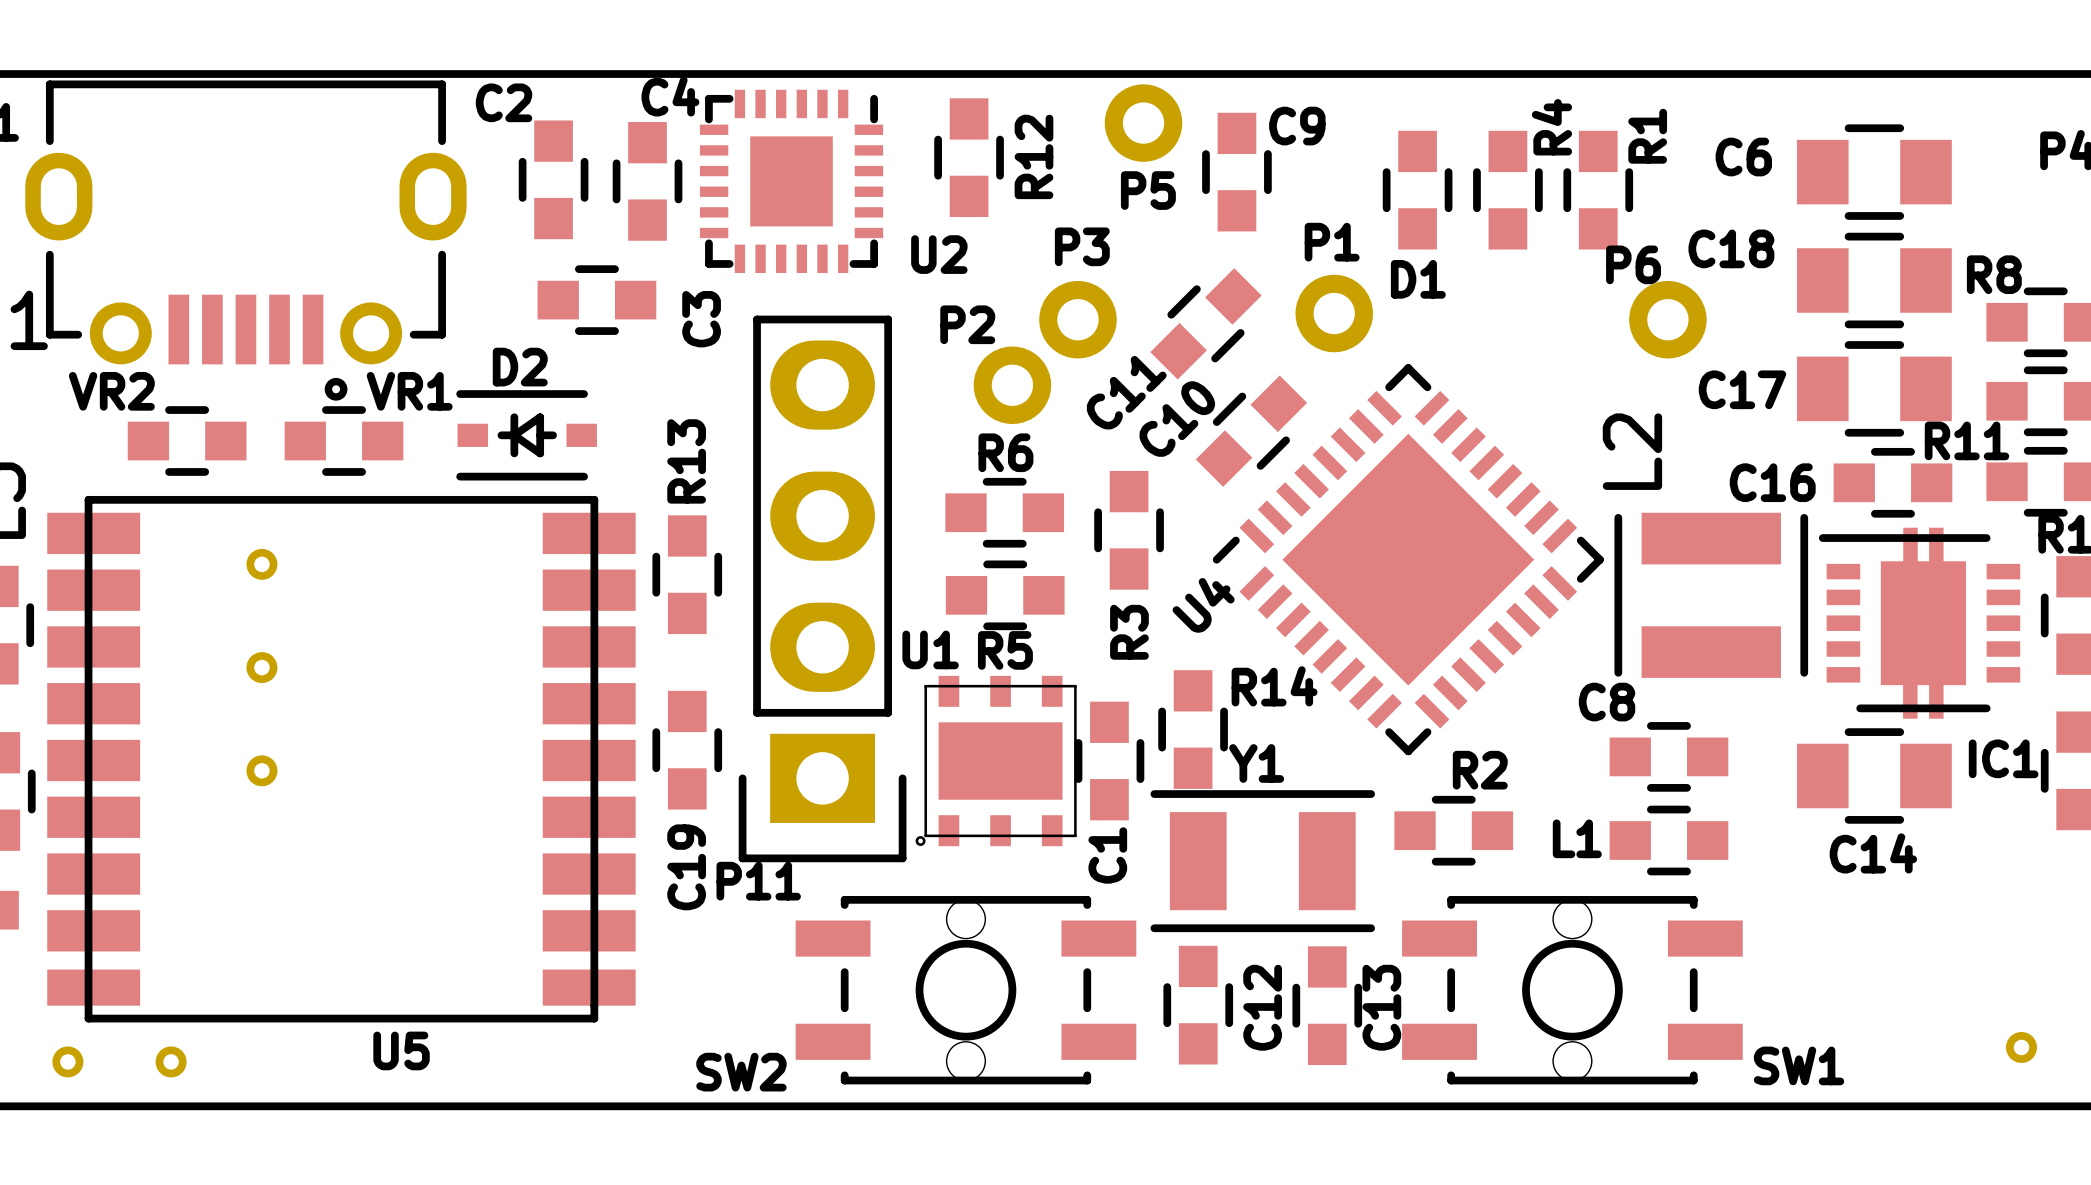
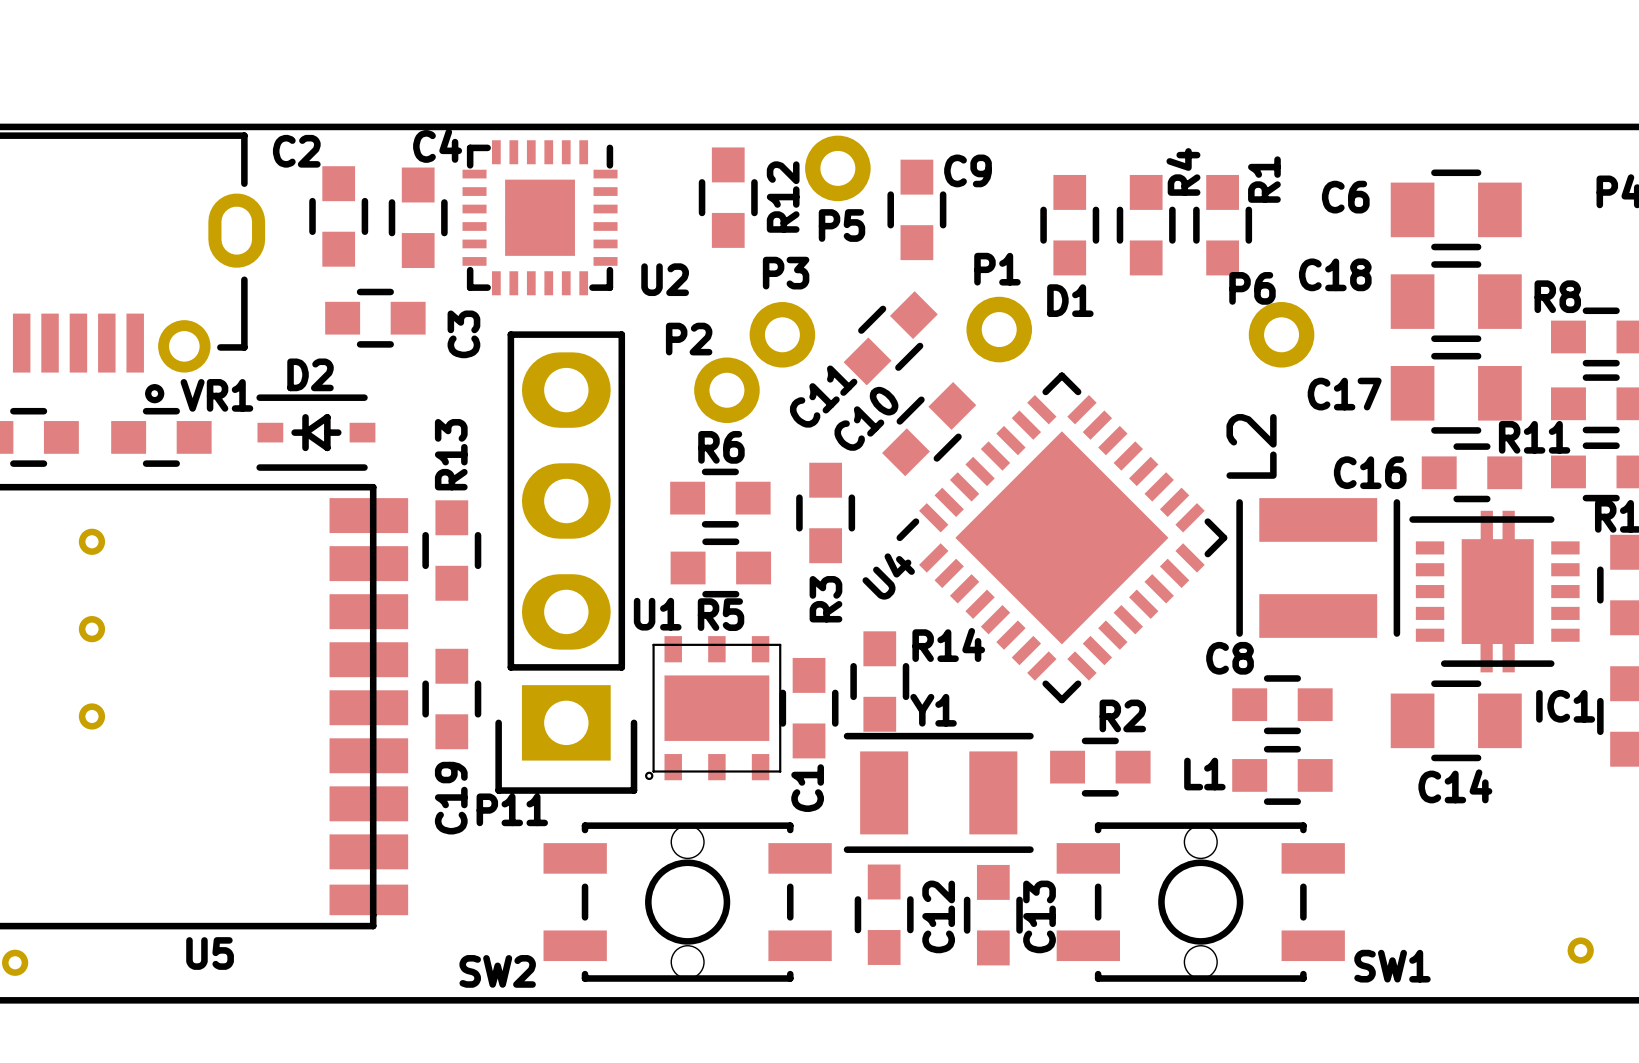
R12 position: (969, 157) -> (728, 197)

